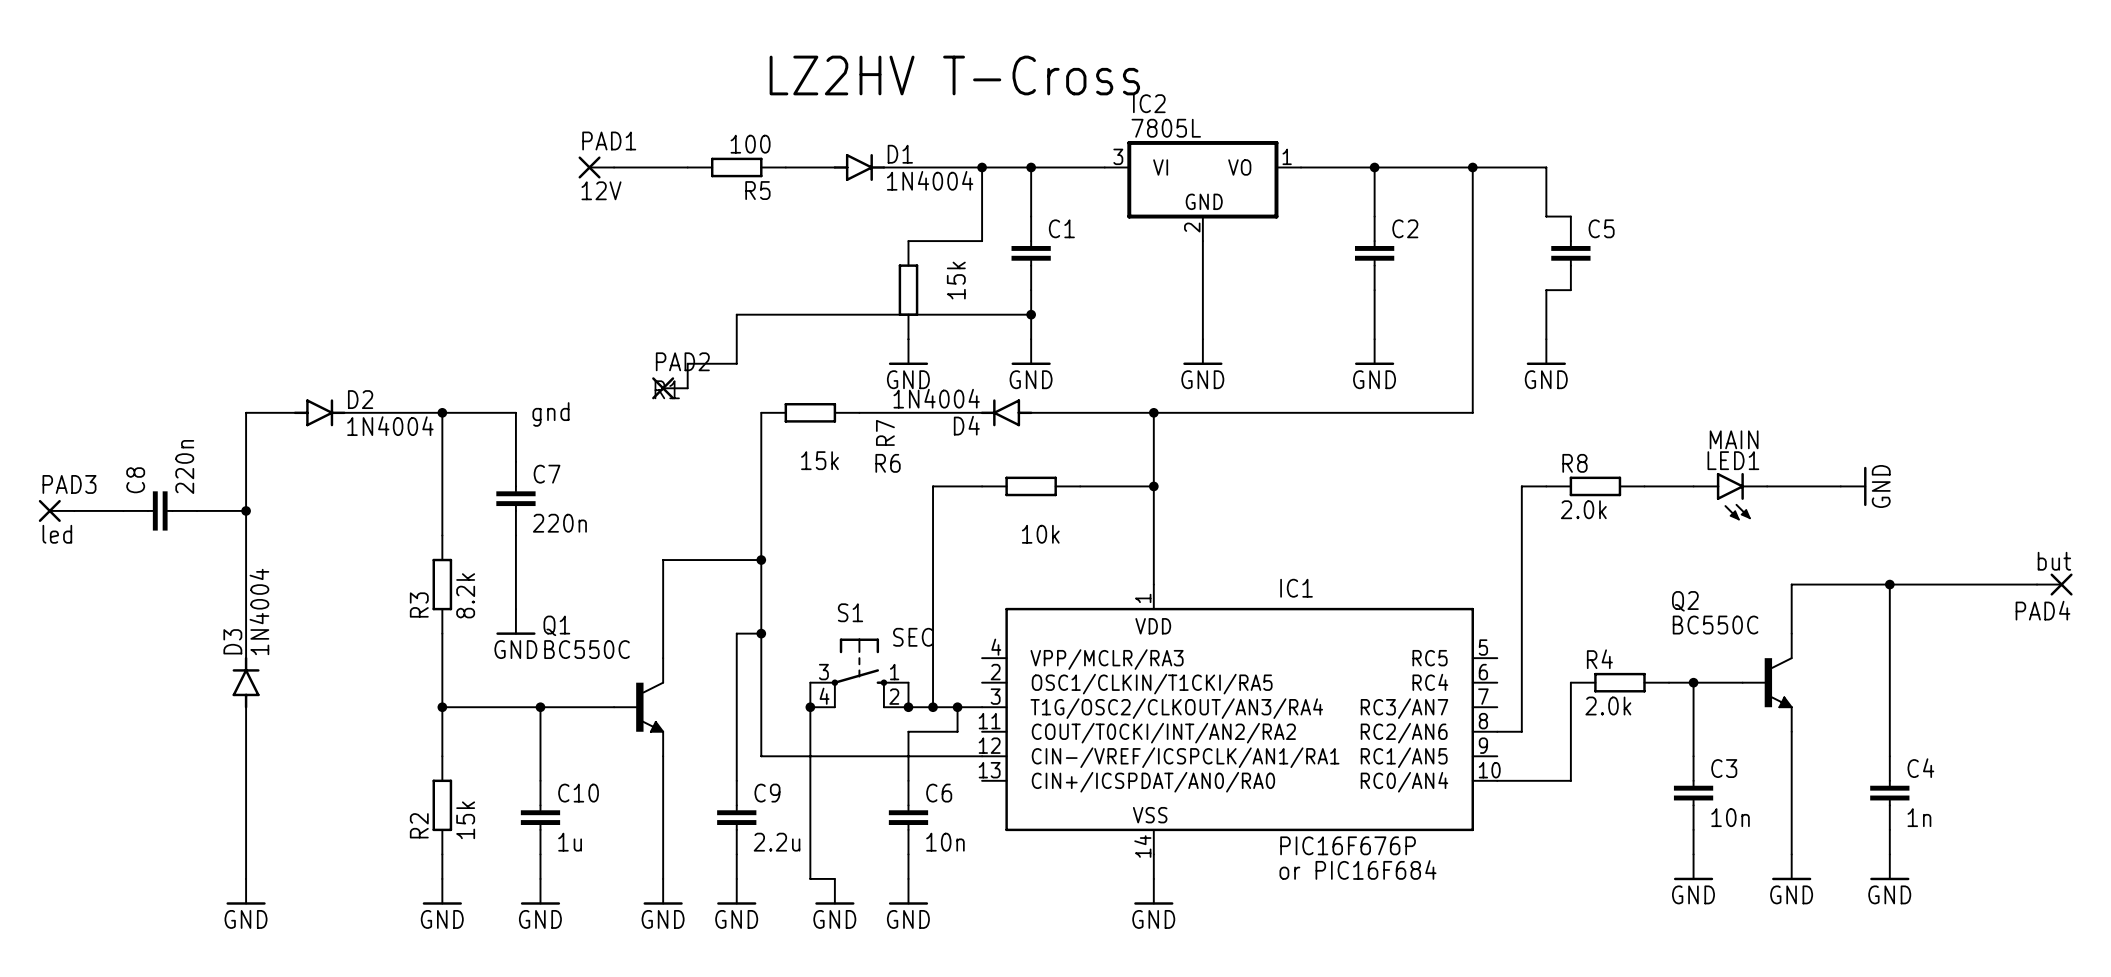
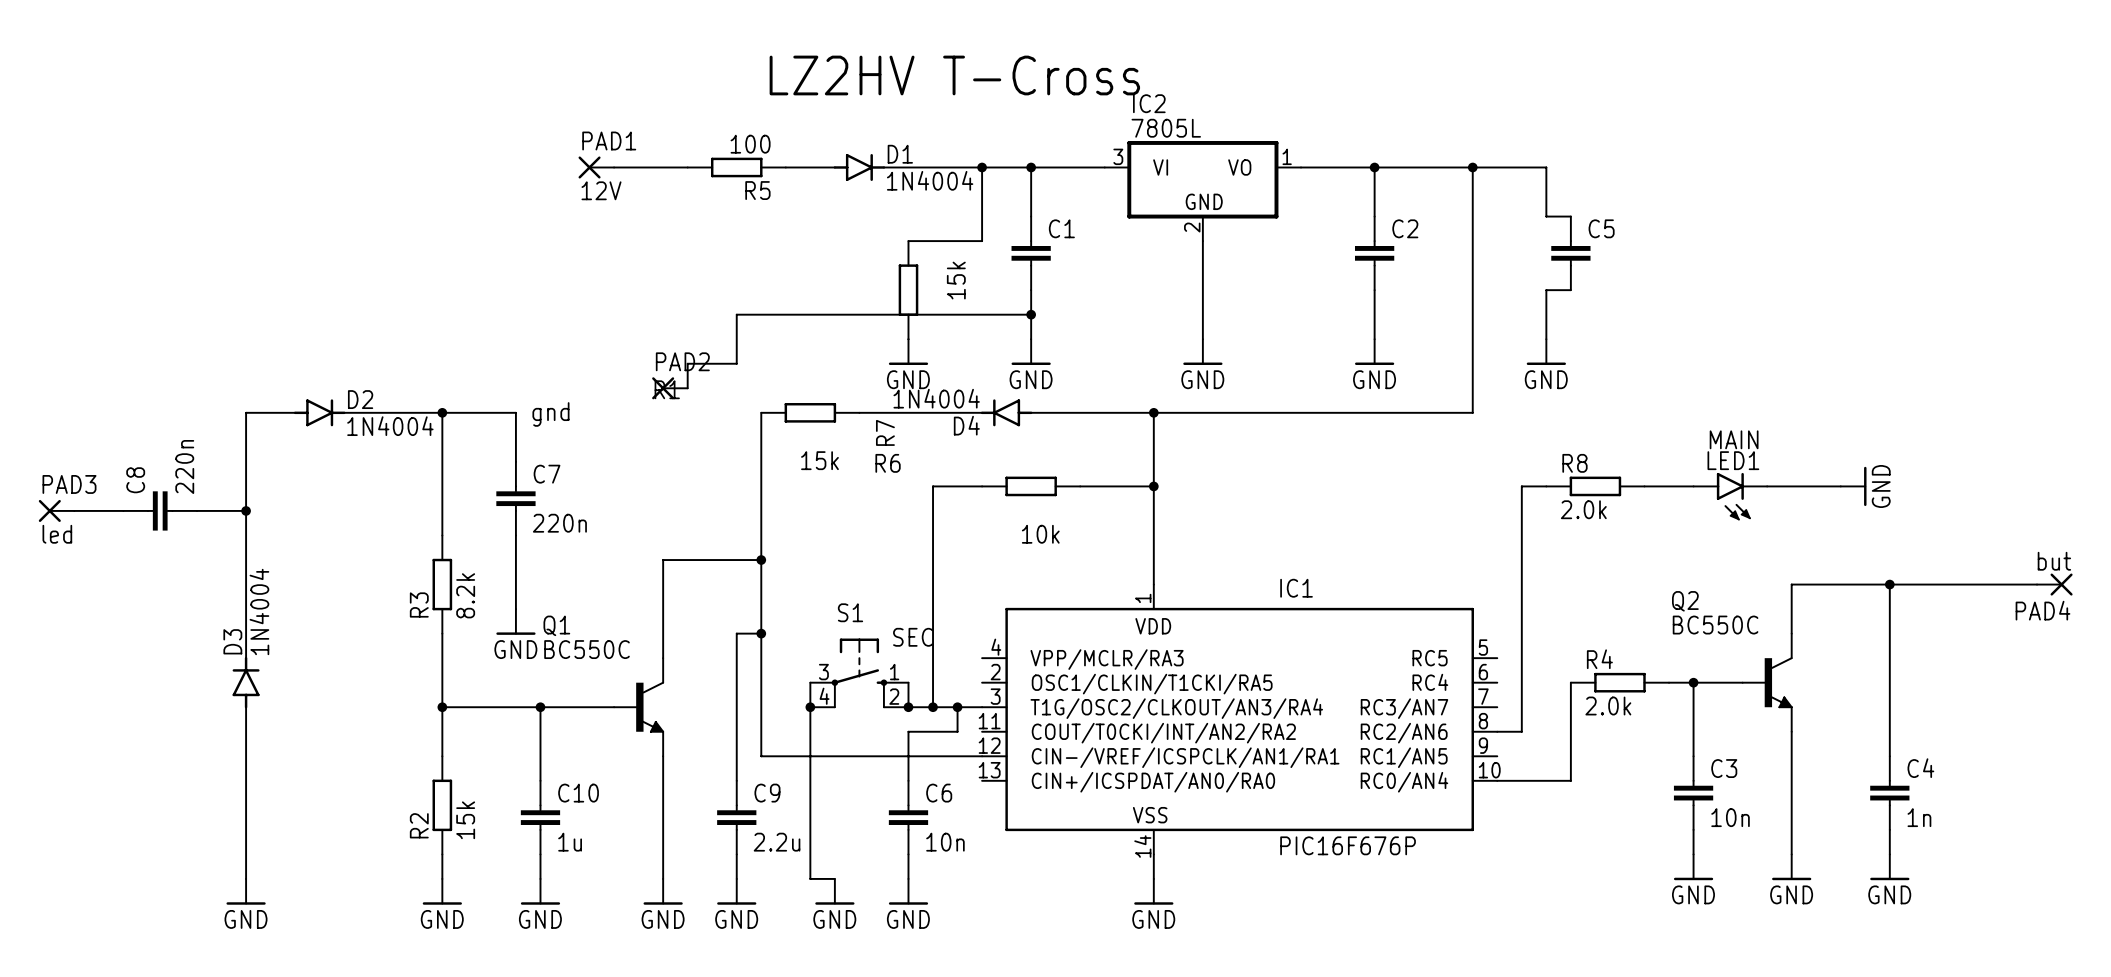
text: or PIC16F684 (1357, 869) -> none

